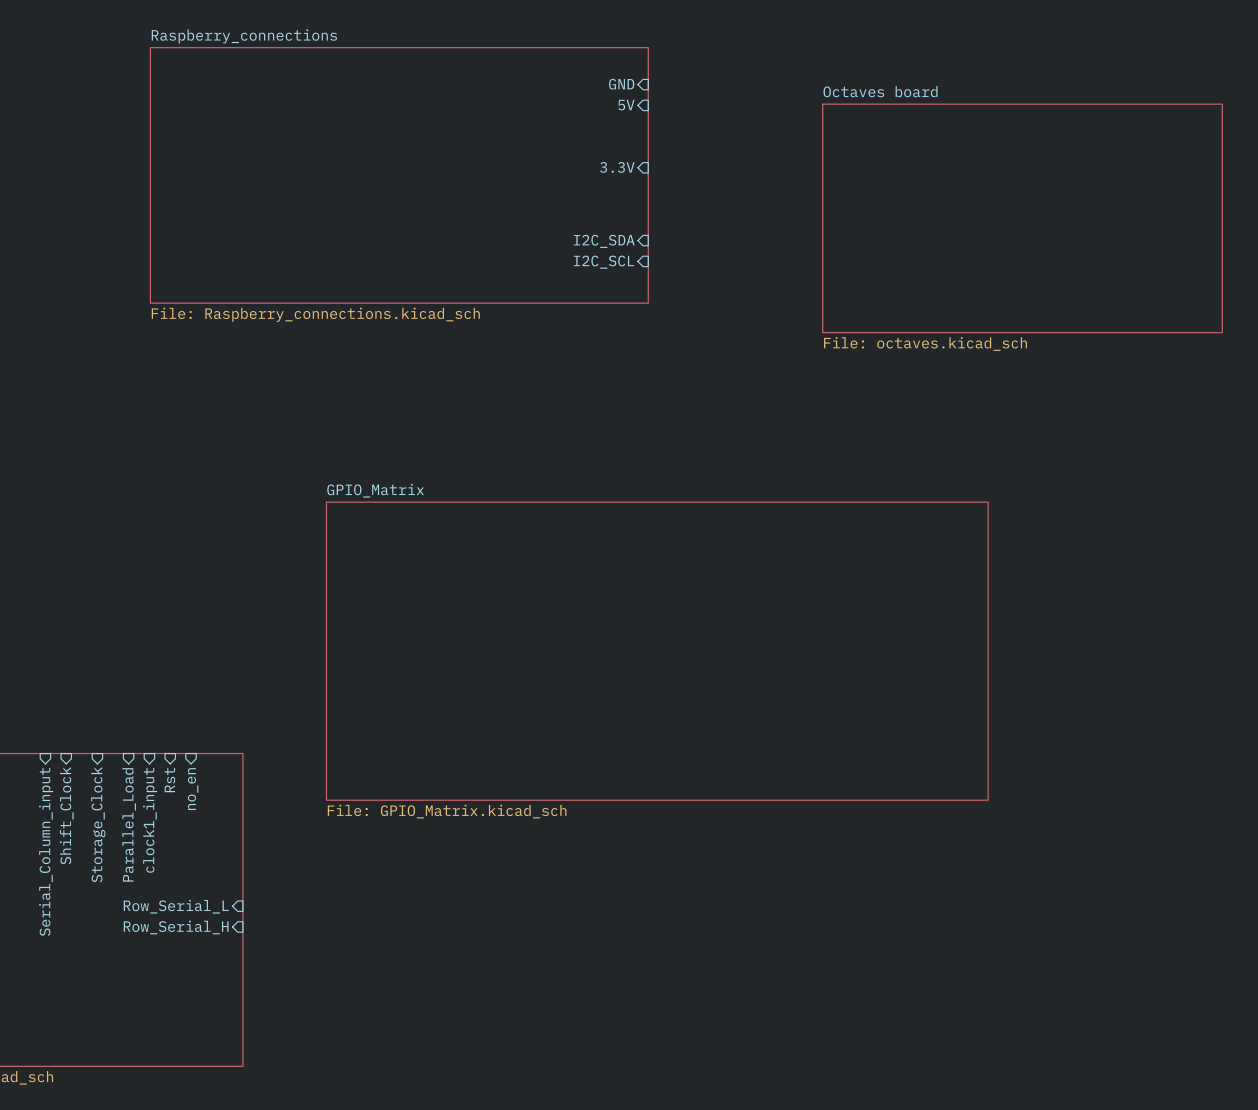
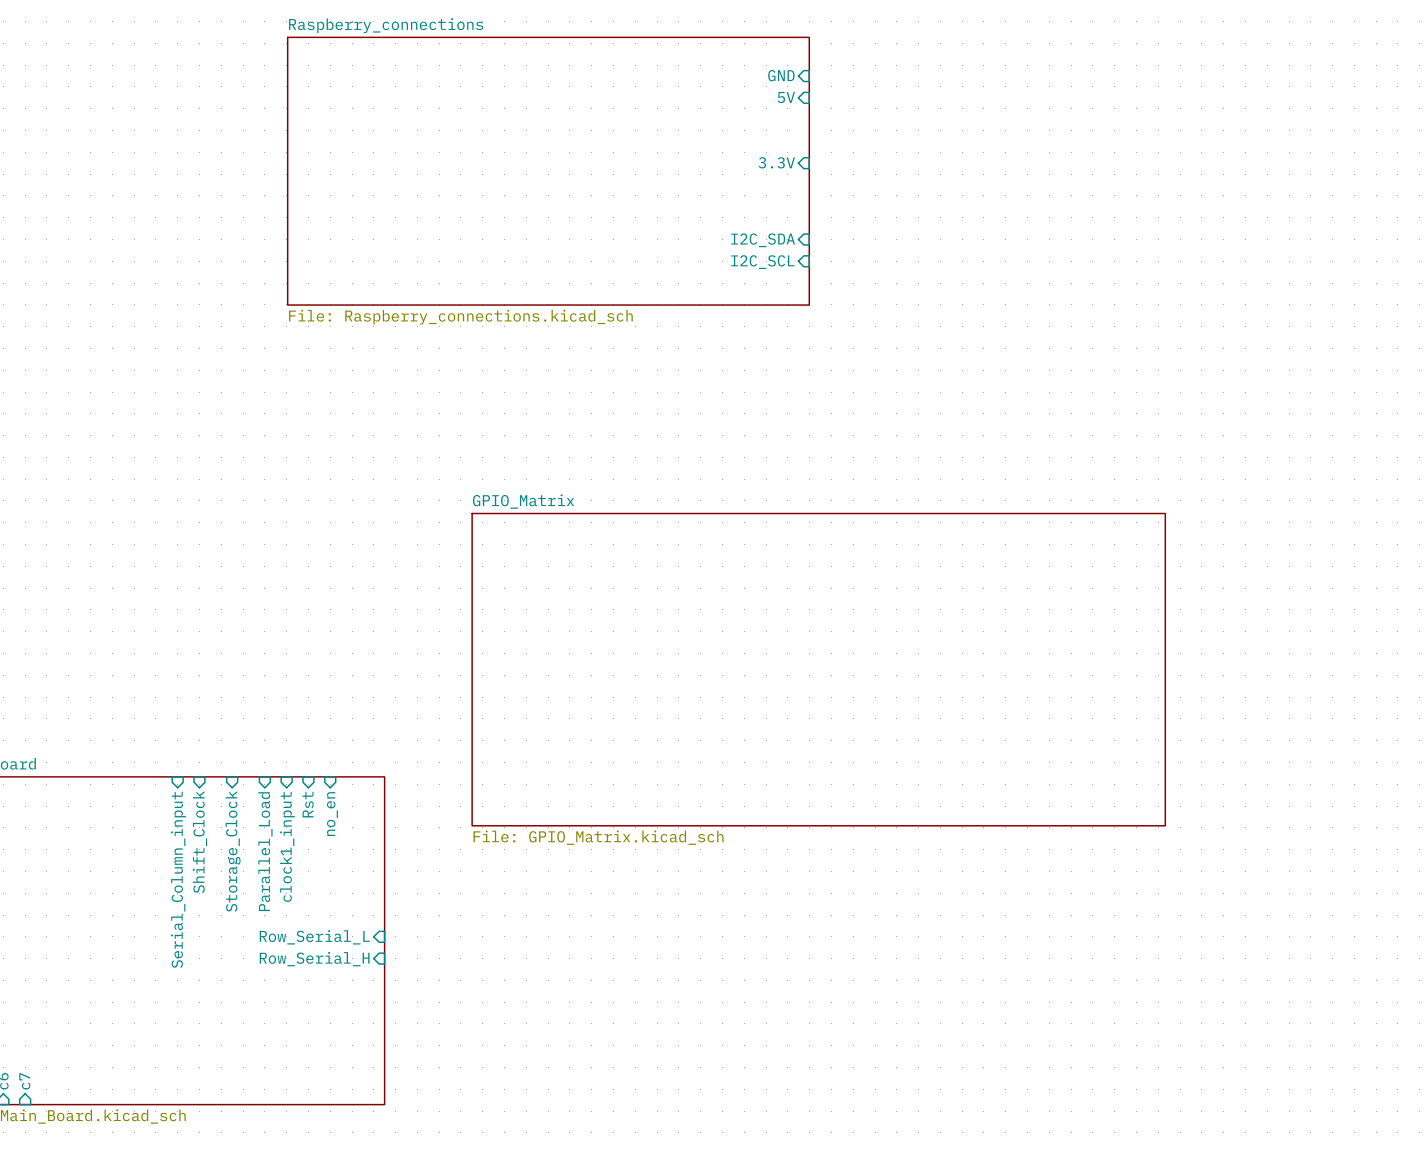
sheet Octaves board: File: octaves.kicad_sch (1022, 218) -> none

